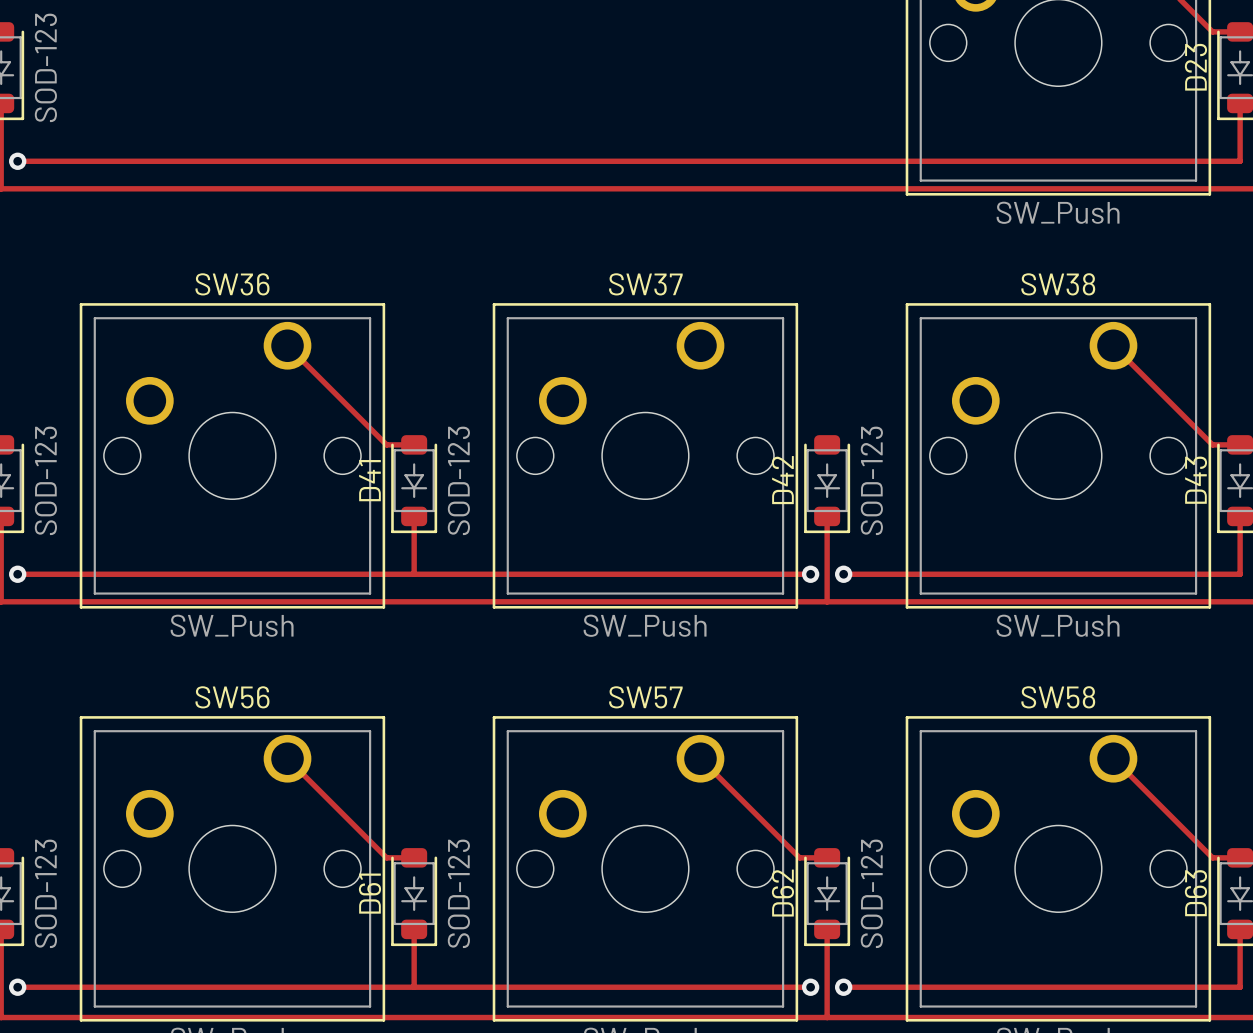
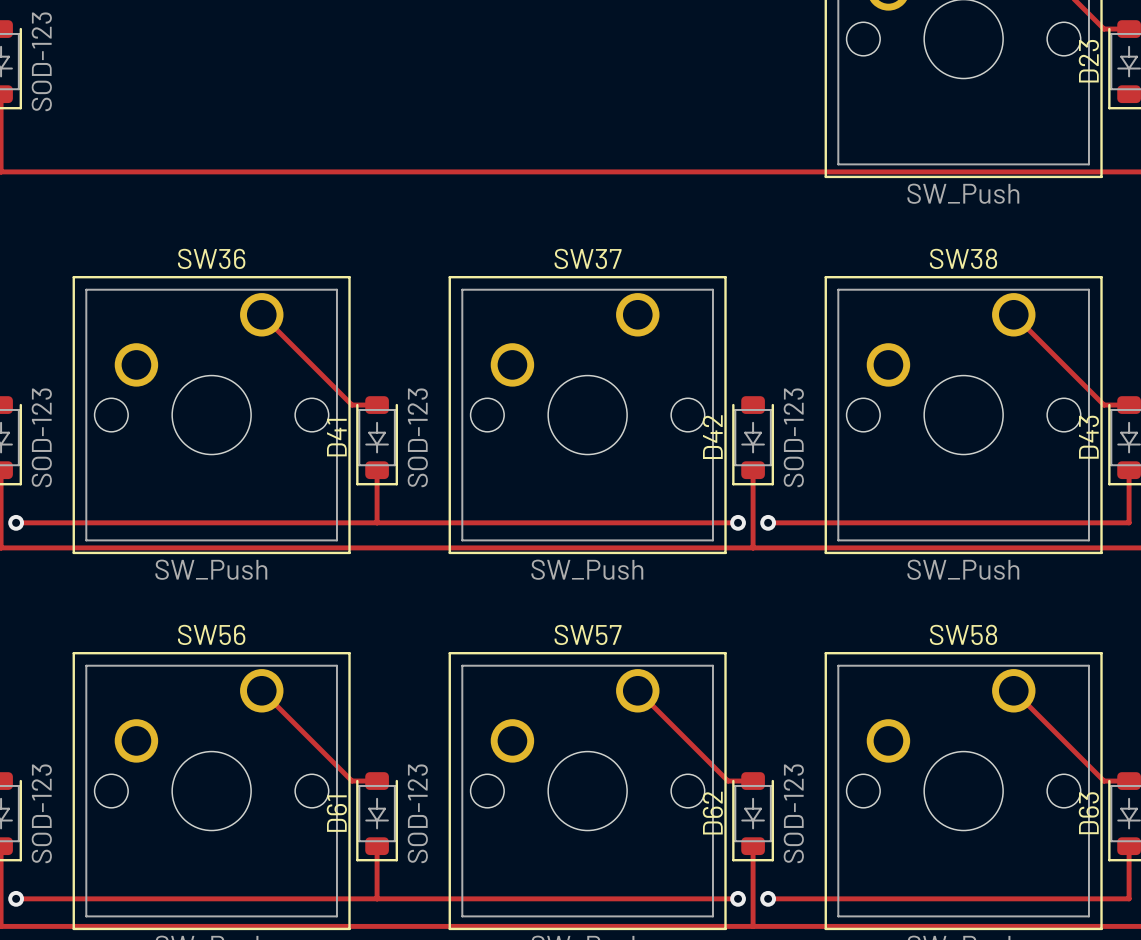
track: (1240, 103) (1240, 161) (17, 161) -> none
via: (17, 161) -> none

